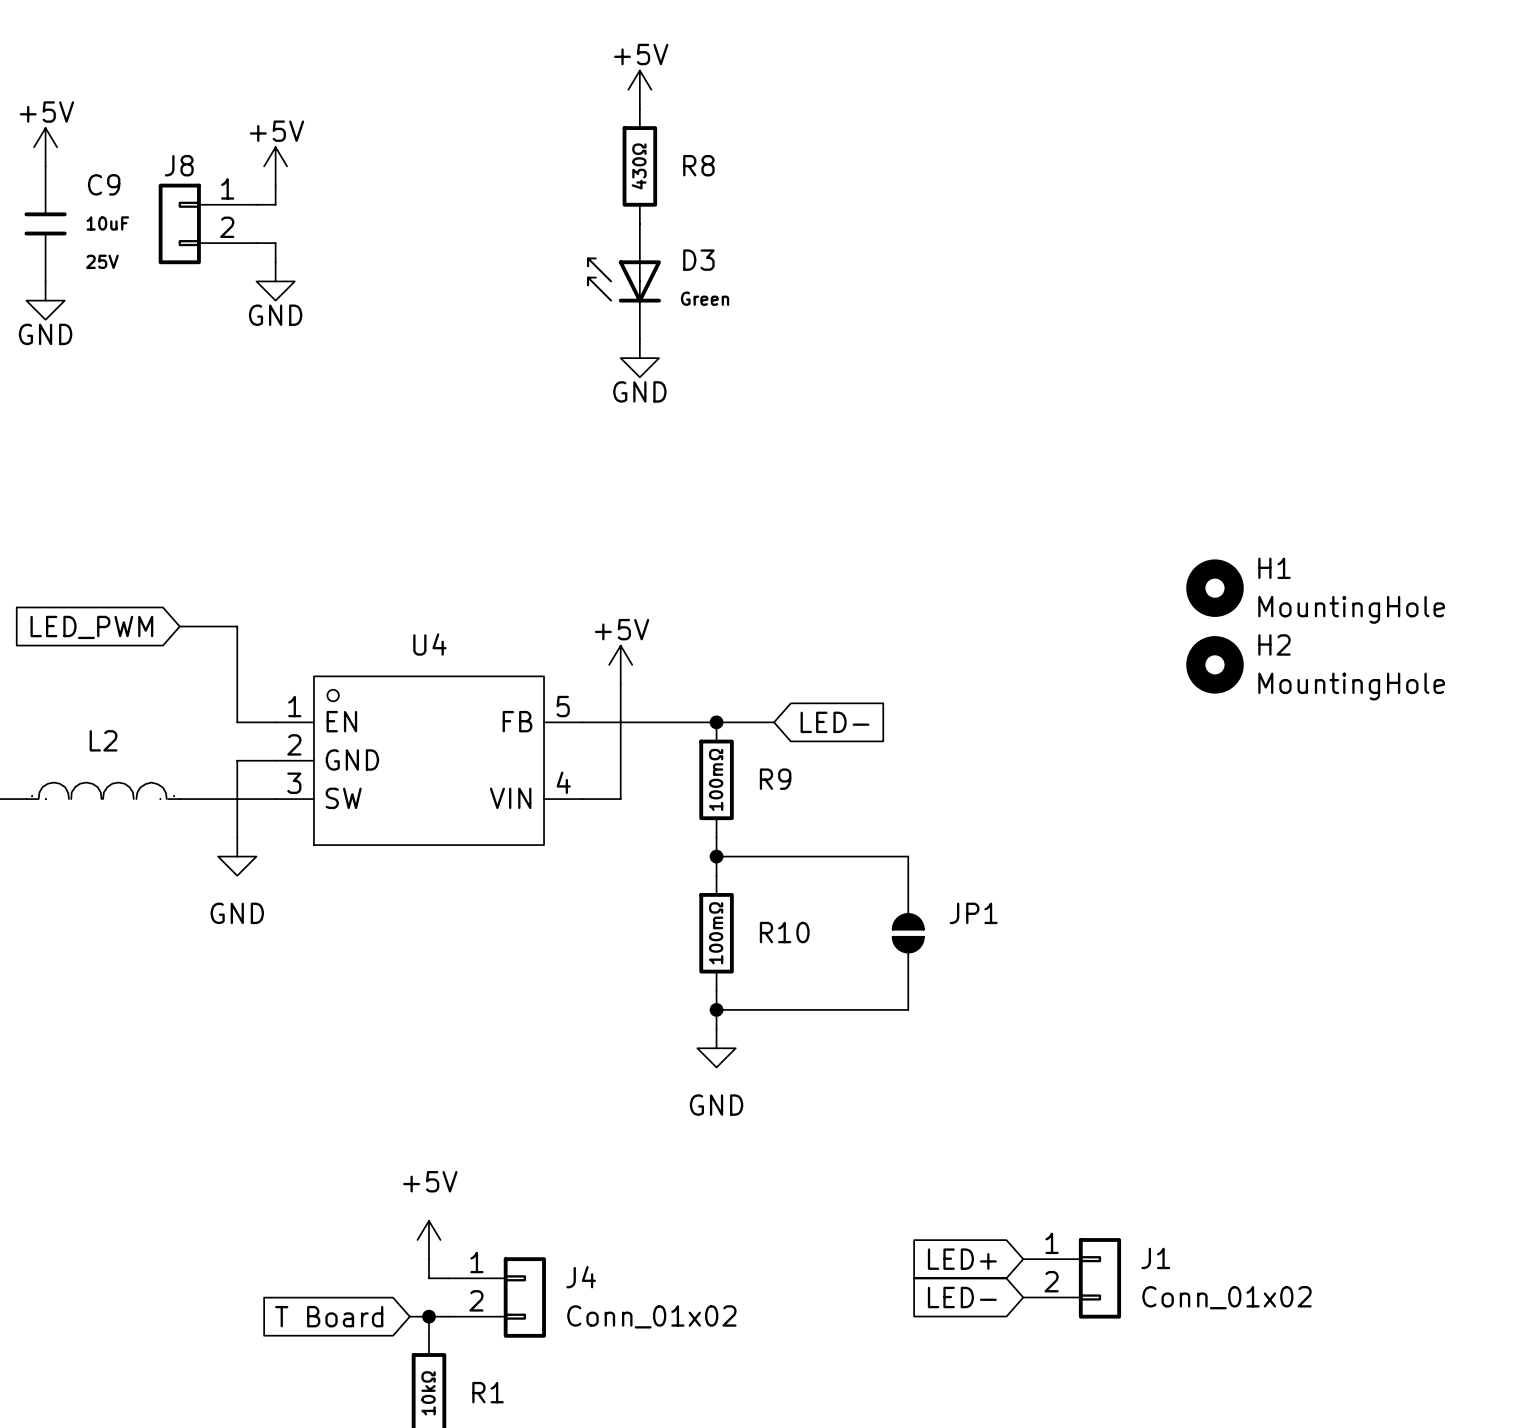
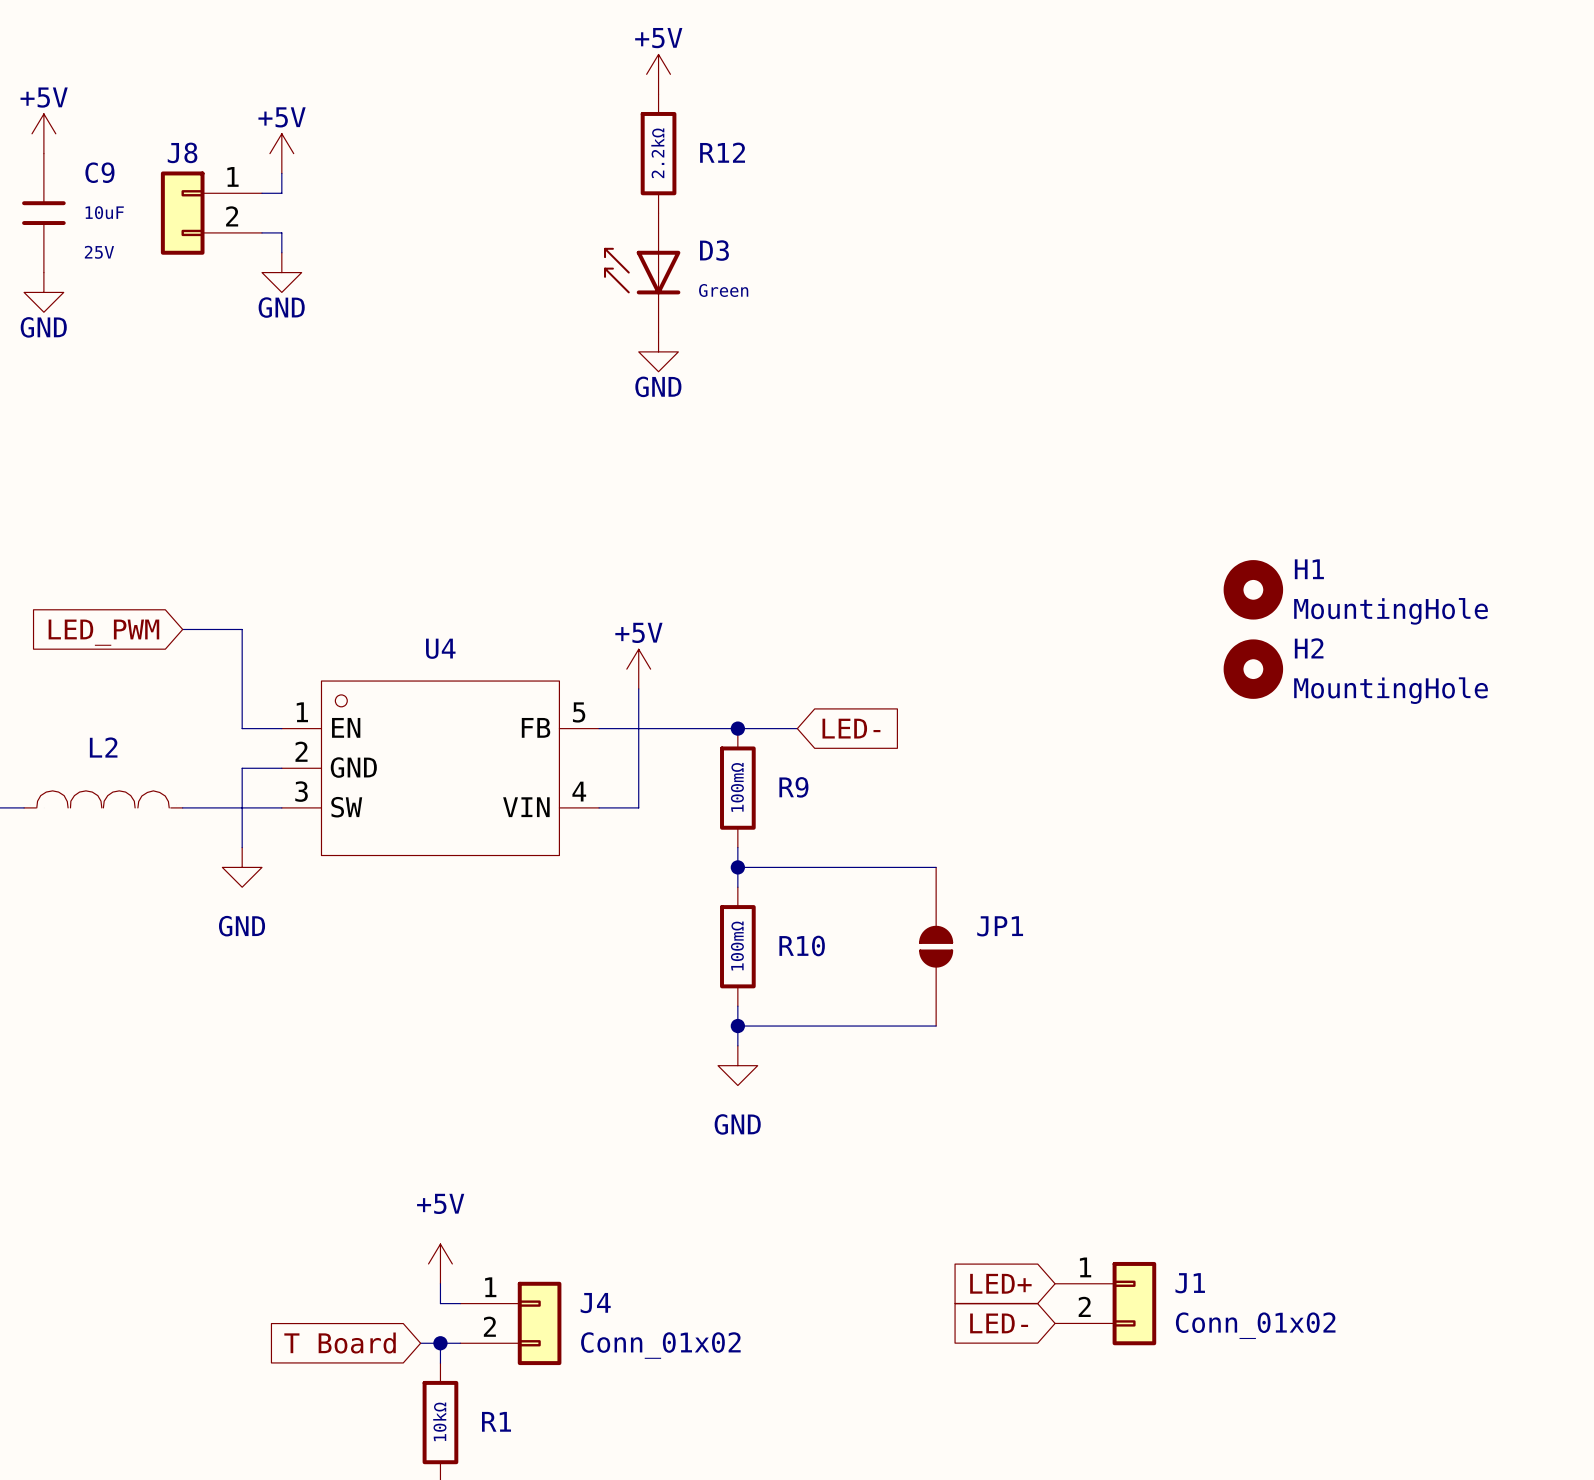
R8 name: R8 (698, 165) -> R12 (722, 152)
R8 value: 430Ω (639, 166) -> 2.2kΩ (657, 153)

